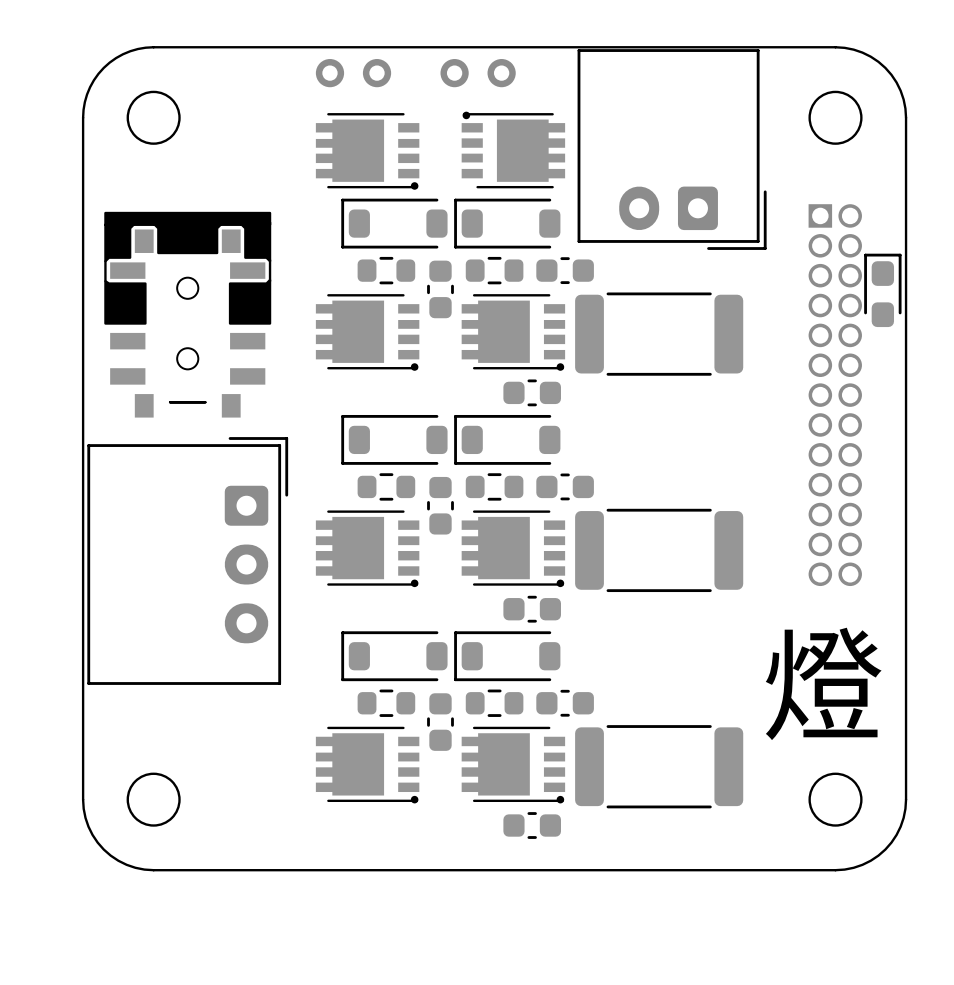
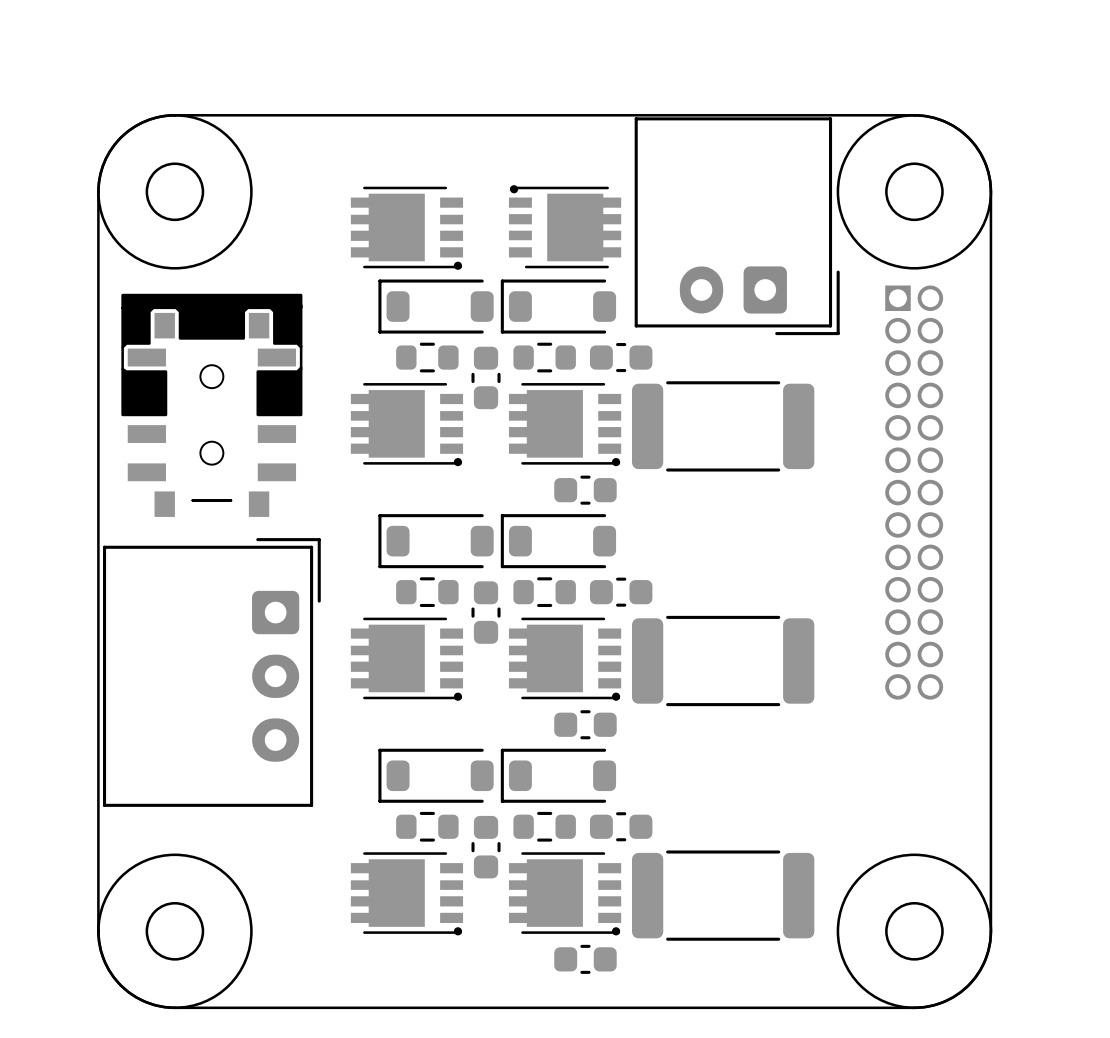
drawing: none -> [97, 114, 253, 270]
drawing: none -> [836, 114, 993, 270]
part: (353, 73) -> none
part: (478, 73) -> none
part: (882, 290) -> none
text: 燈 (823, 683) -> none
drawing: none -> [97, 853, 253, 1010]
drawing: none -> [836, 853, 993, 1010]

